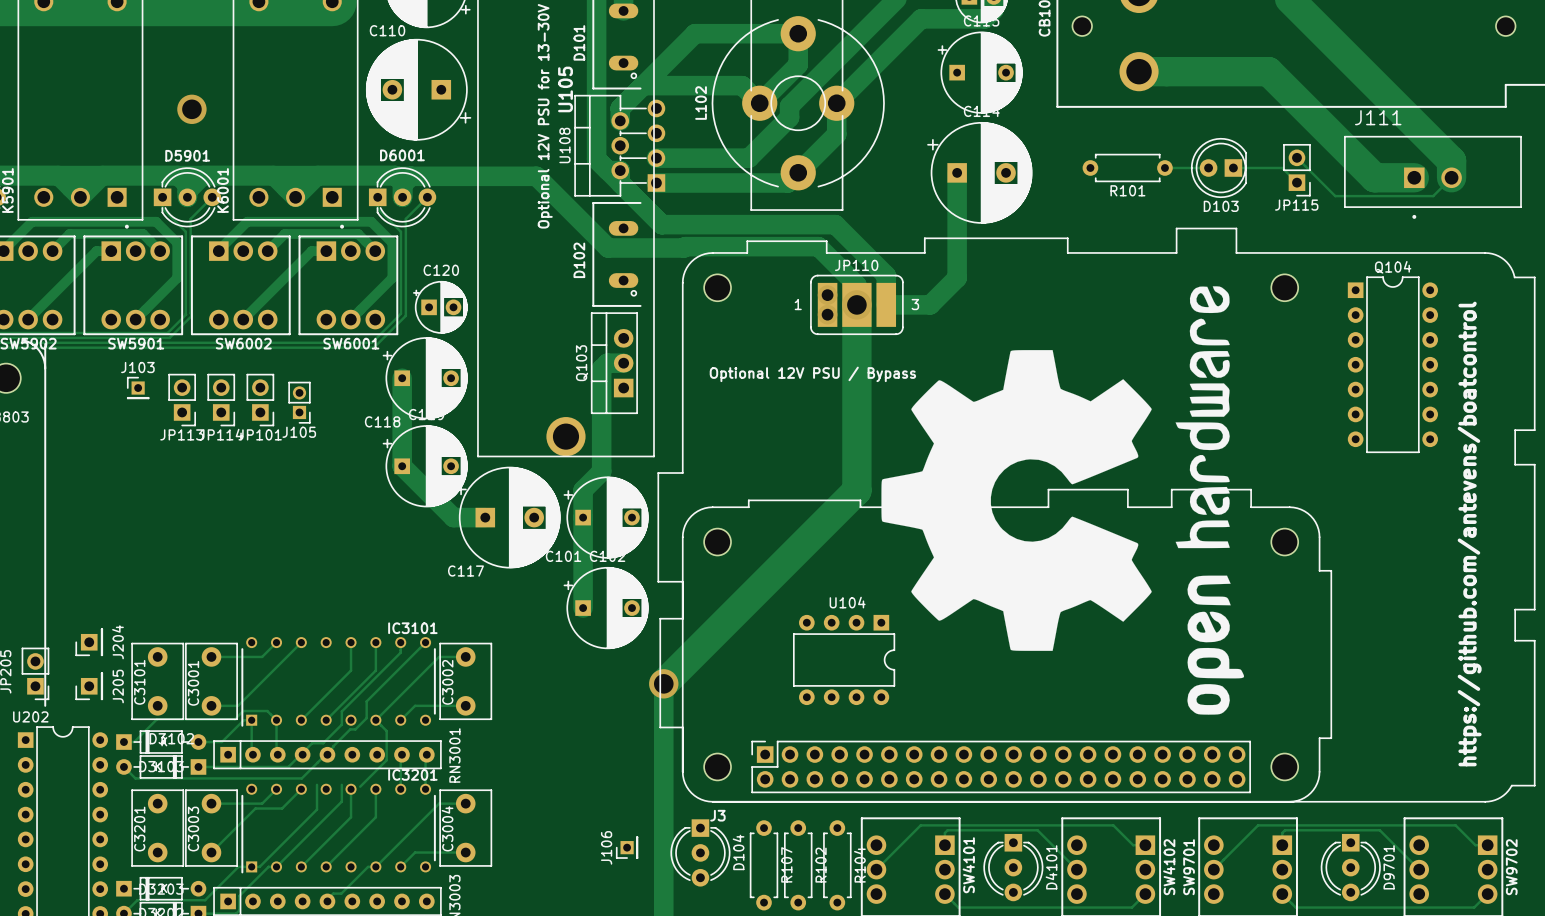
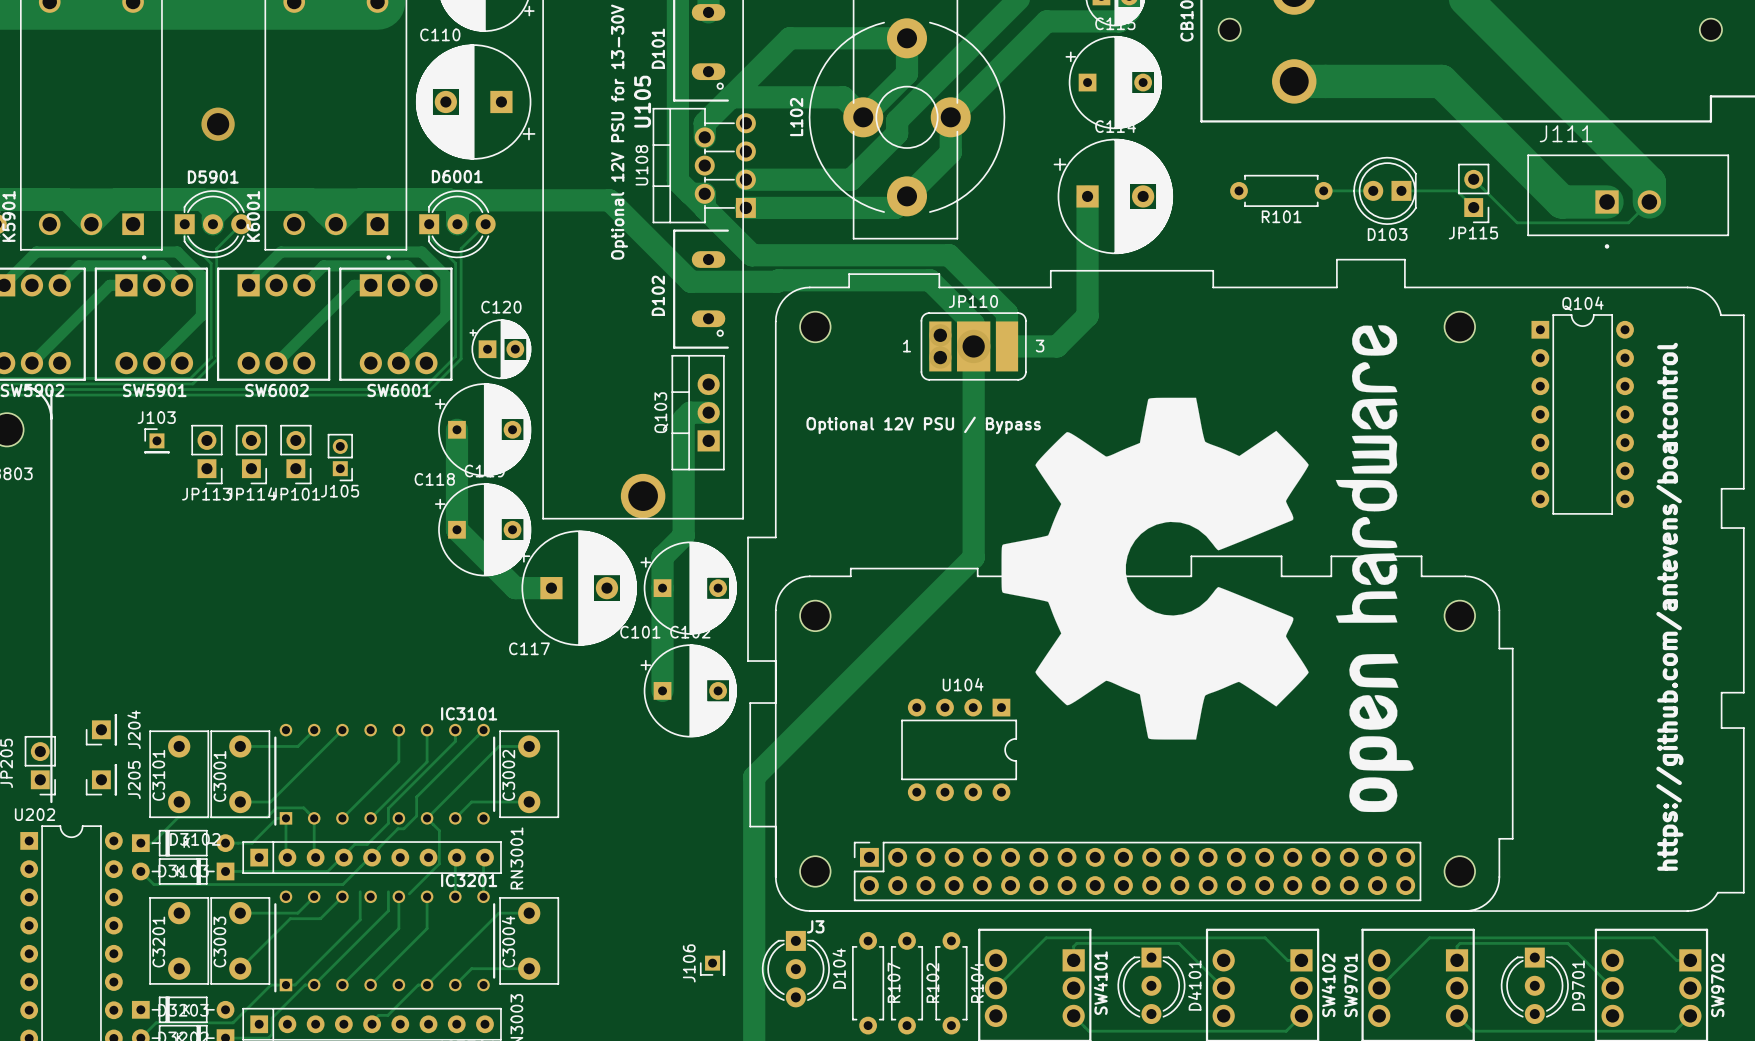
track width: thick (856, 304) (856, 490) (663, 683) -> thin (973, 346) (973, 557) (754, 777)
via: (663, 683) -> none

